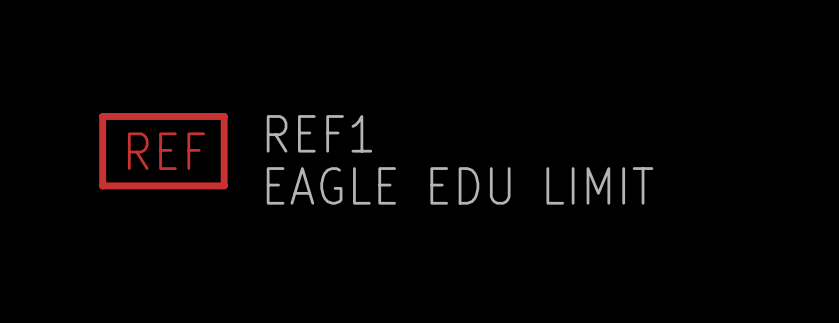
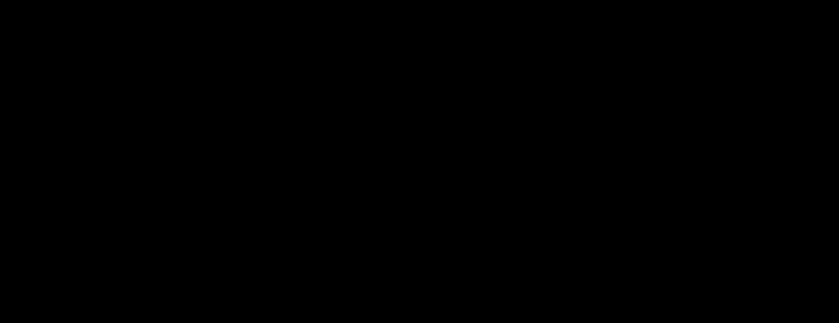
REF1: EAGLE EDU LIMIT (163, 151) -> none

